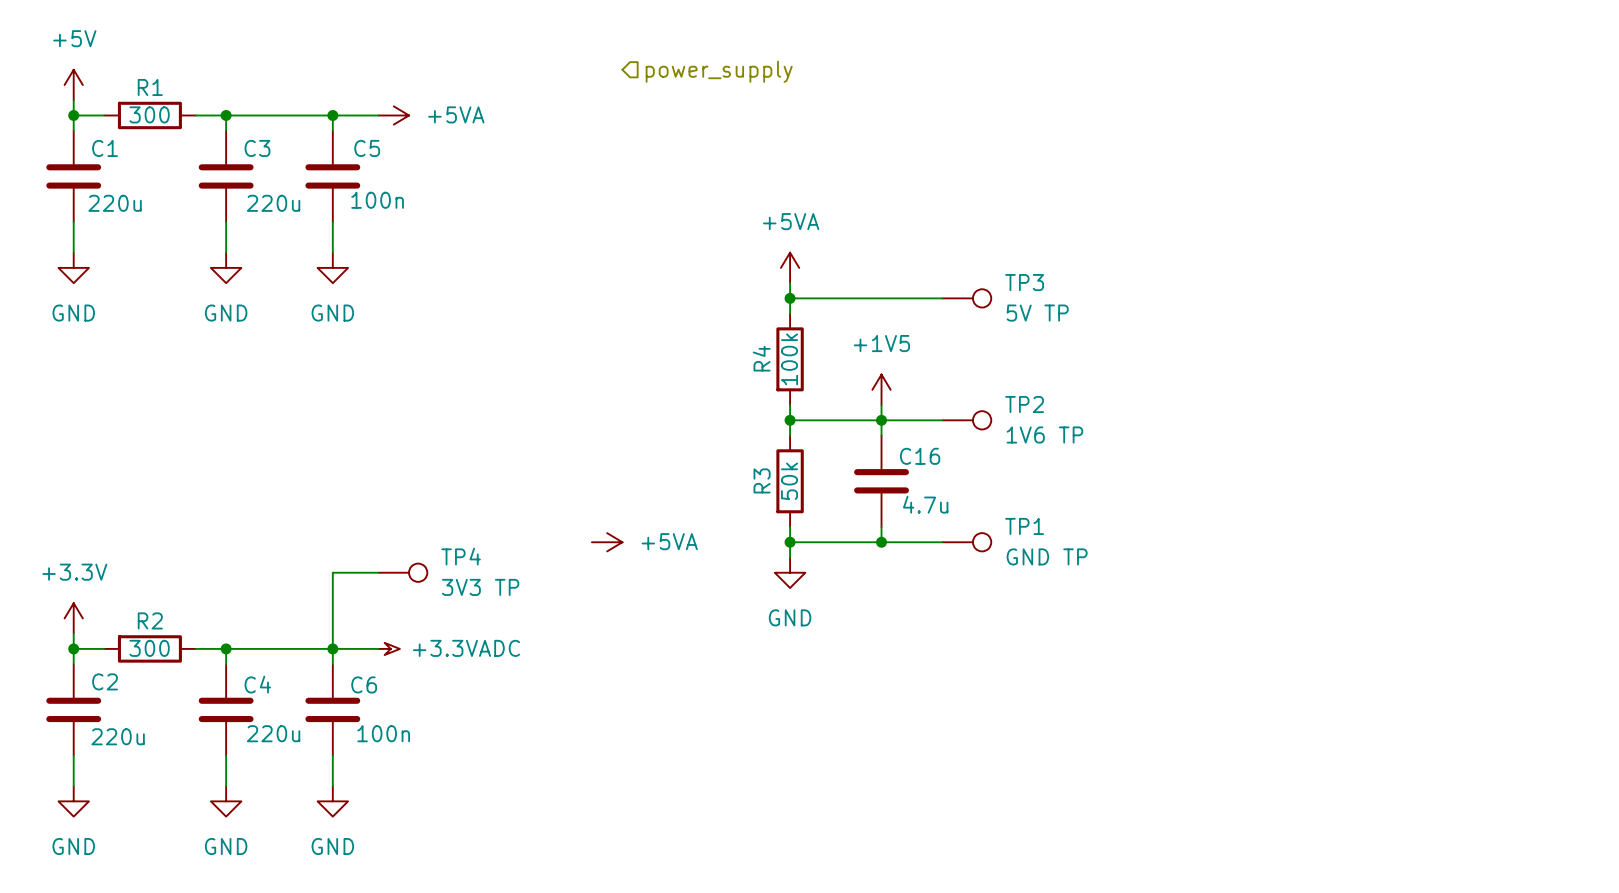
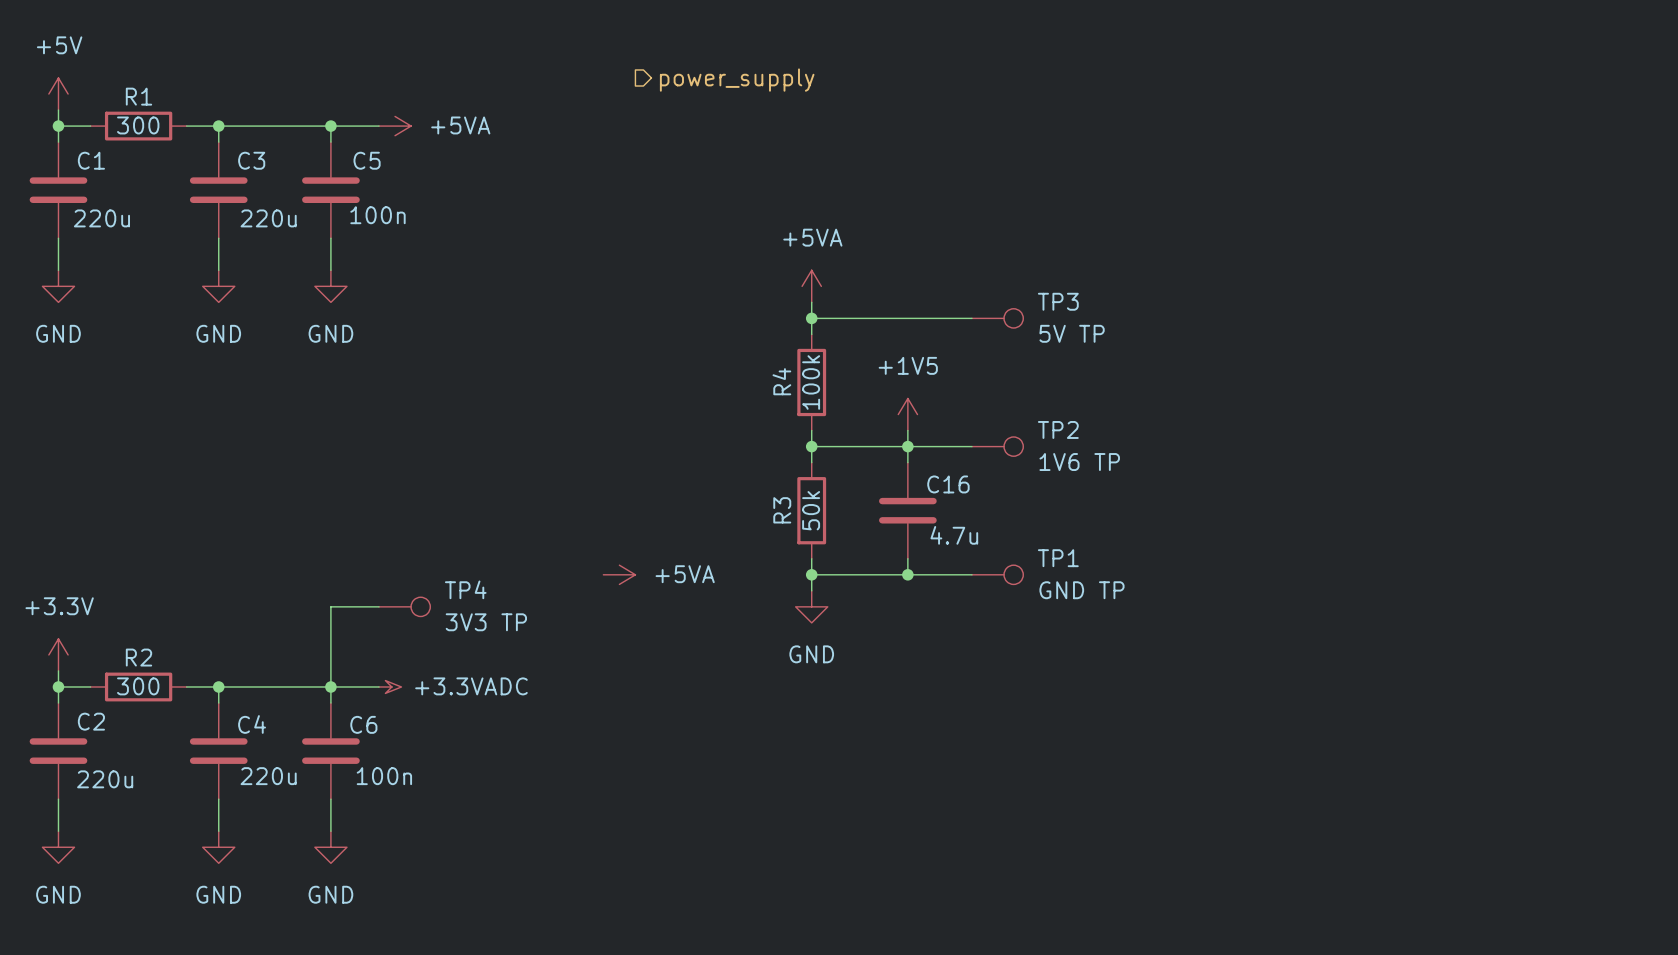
hierarchical label shape: input (719, 71) -> output (737, 80)

